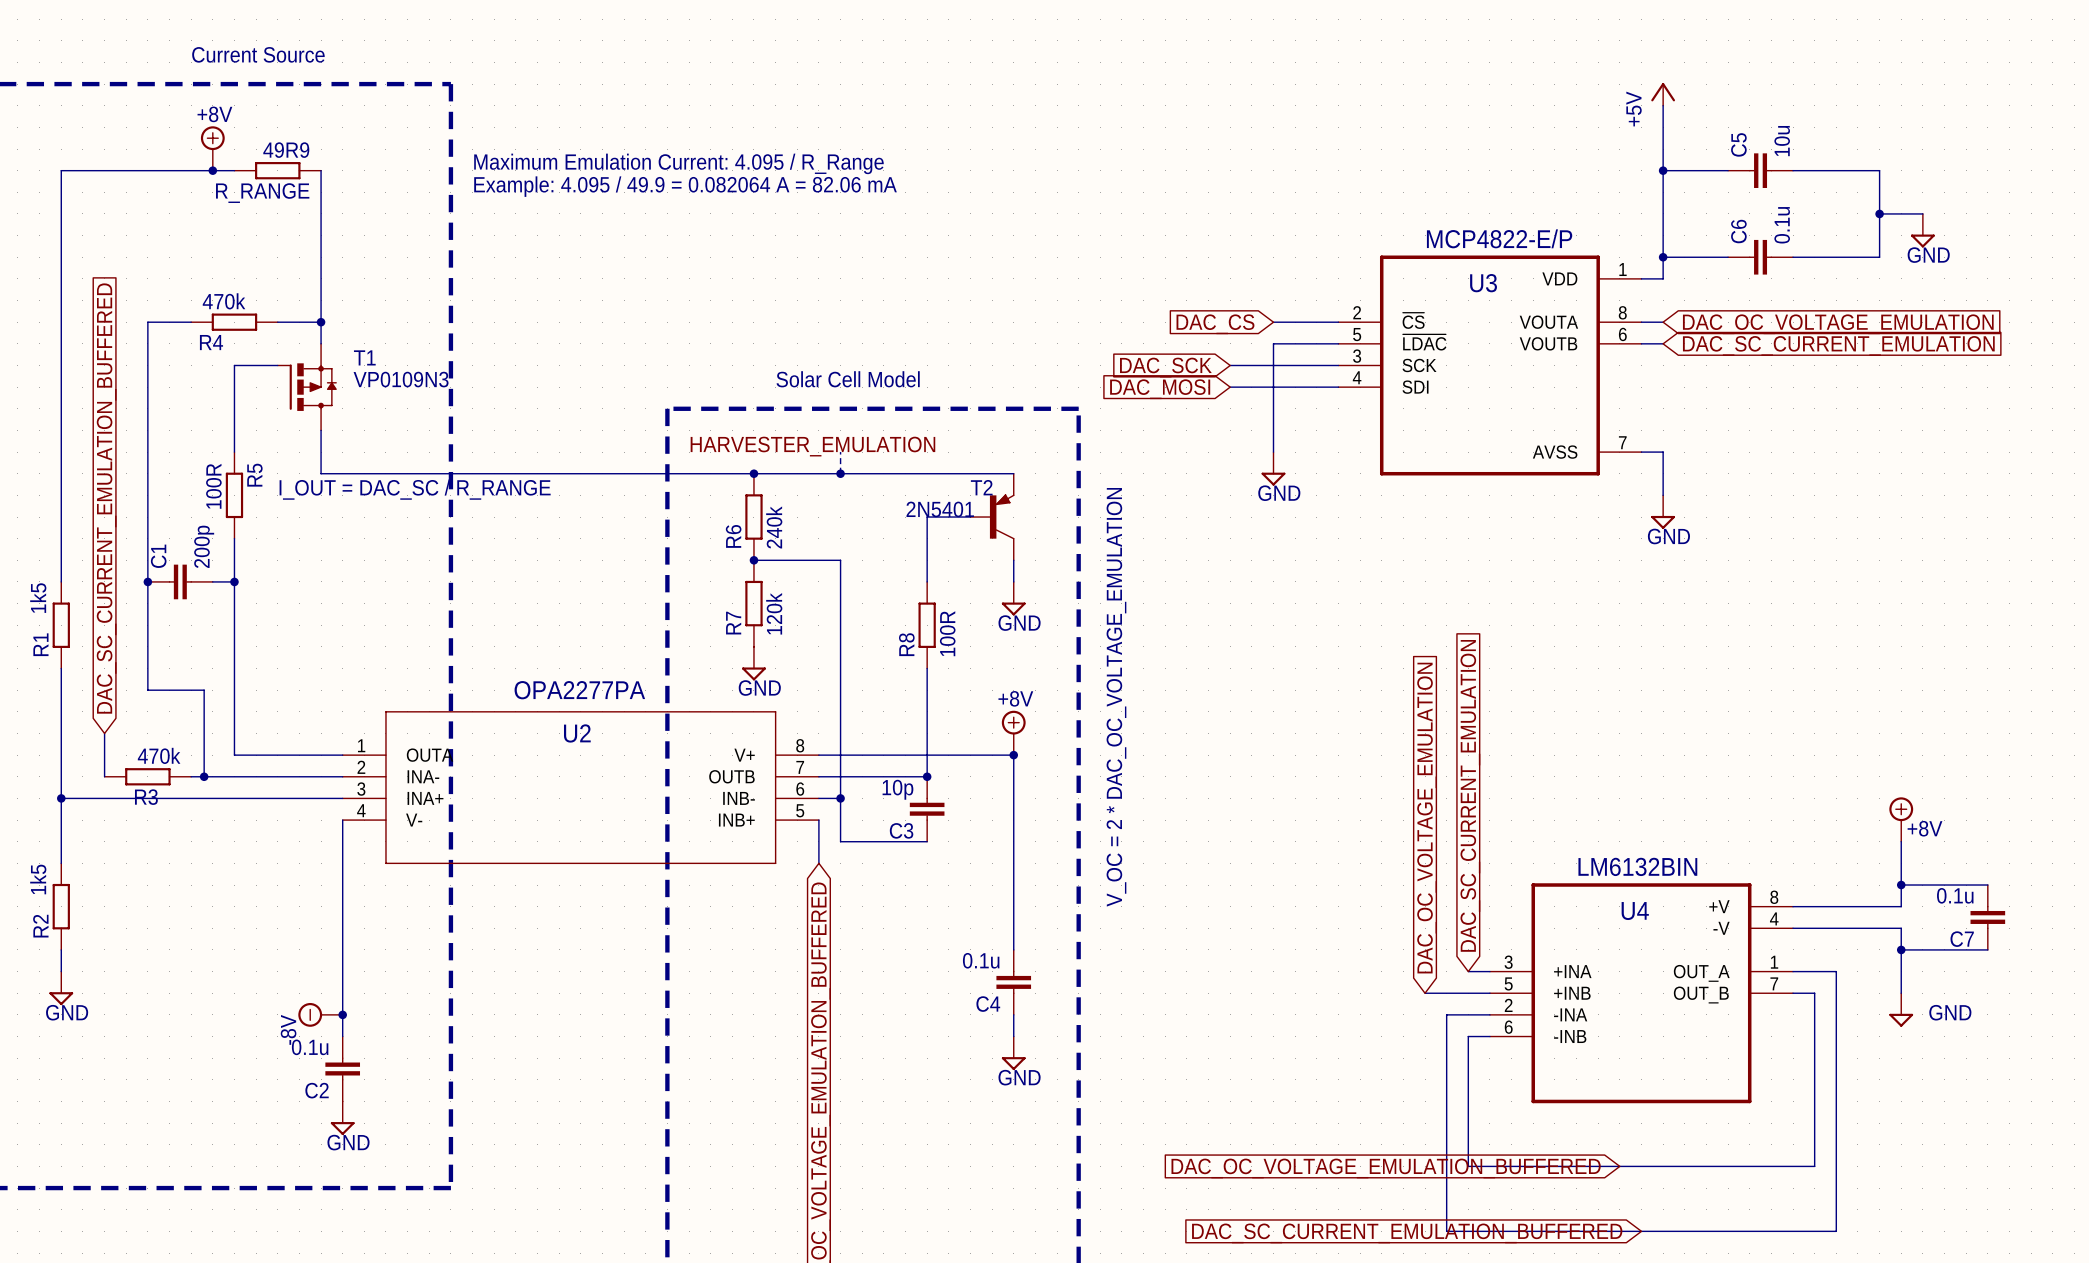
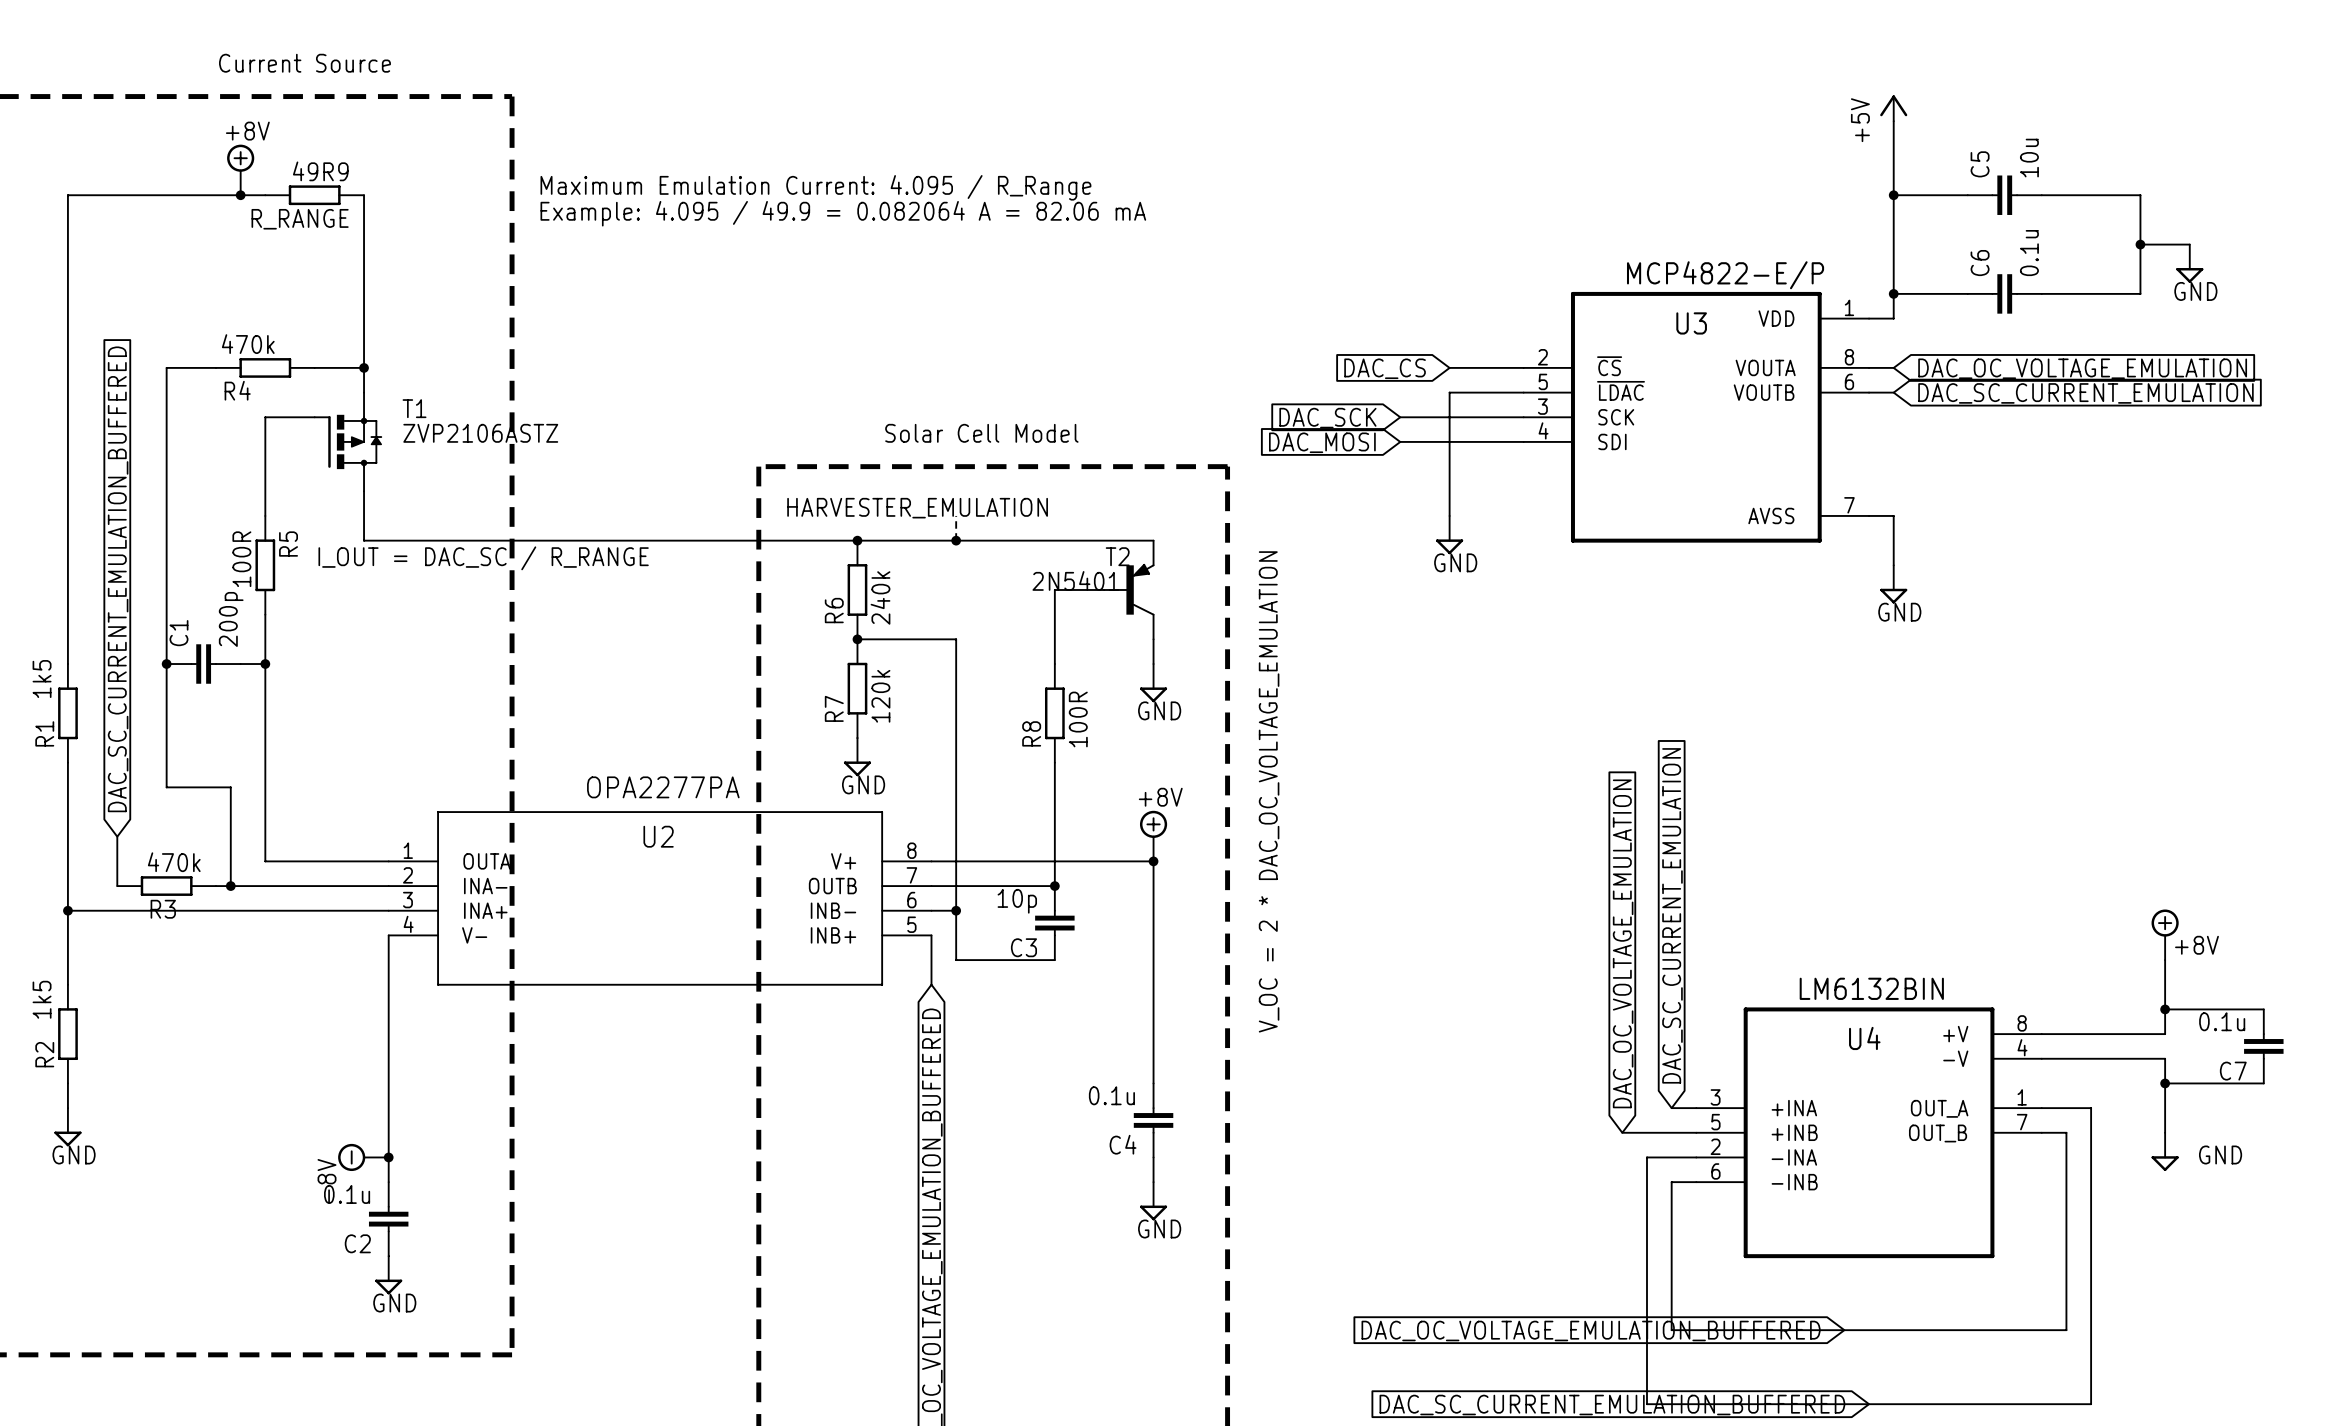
T1 value: VP0109N3 (401, 379) -> ZVP2106ASTZ (480, 433)

